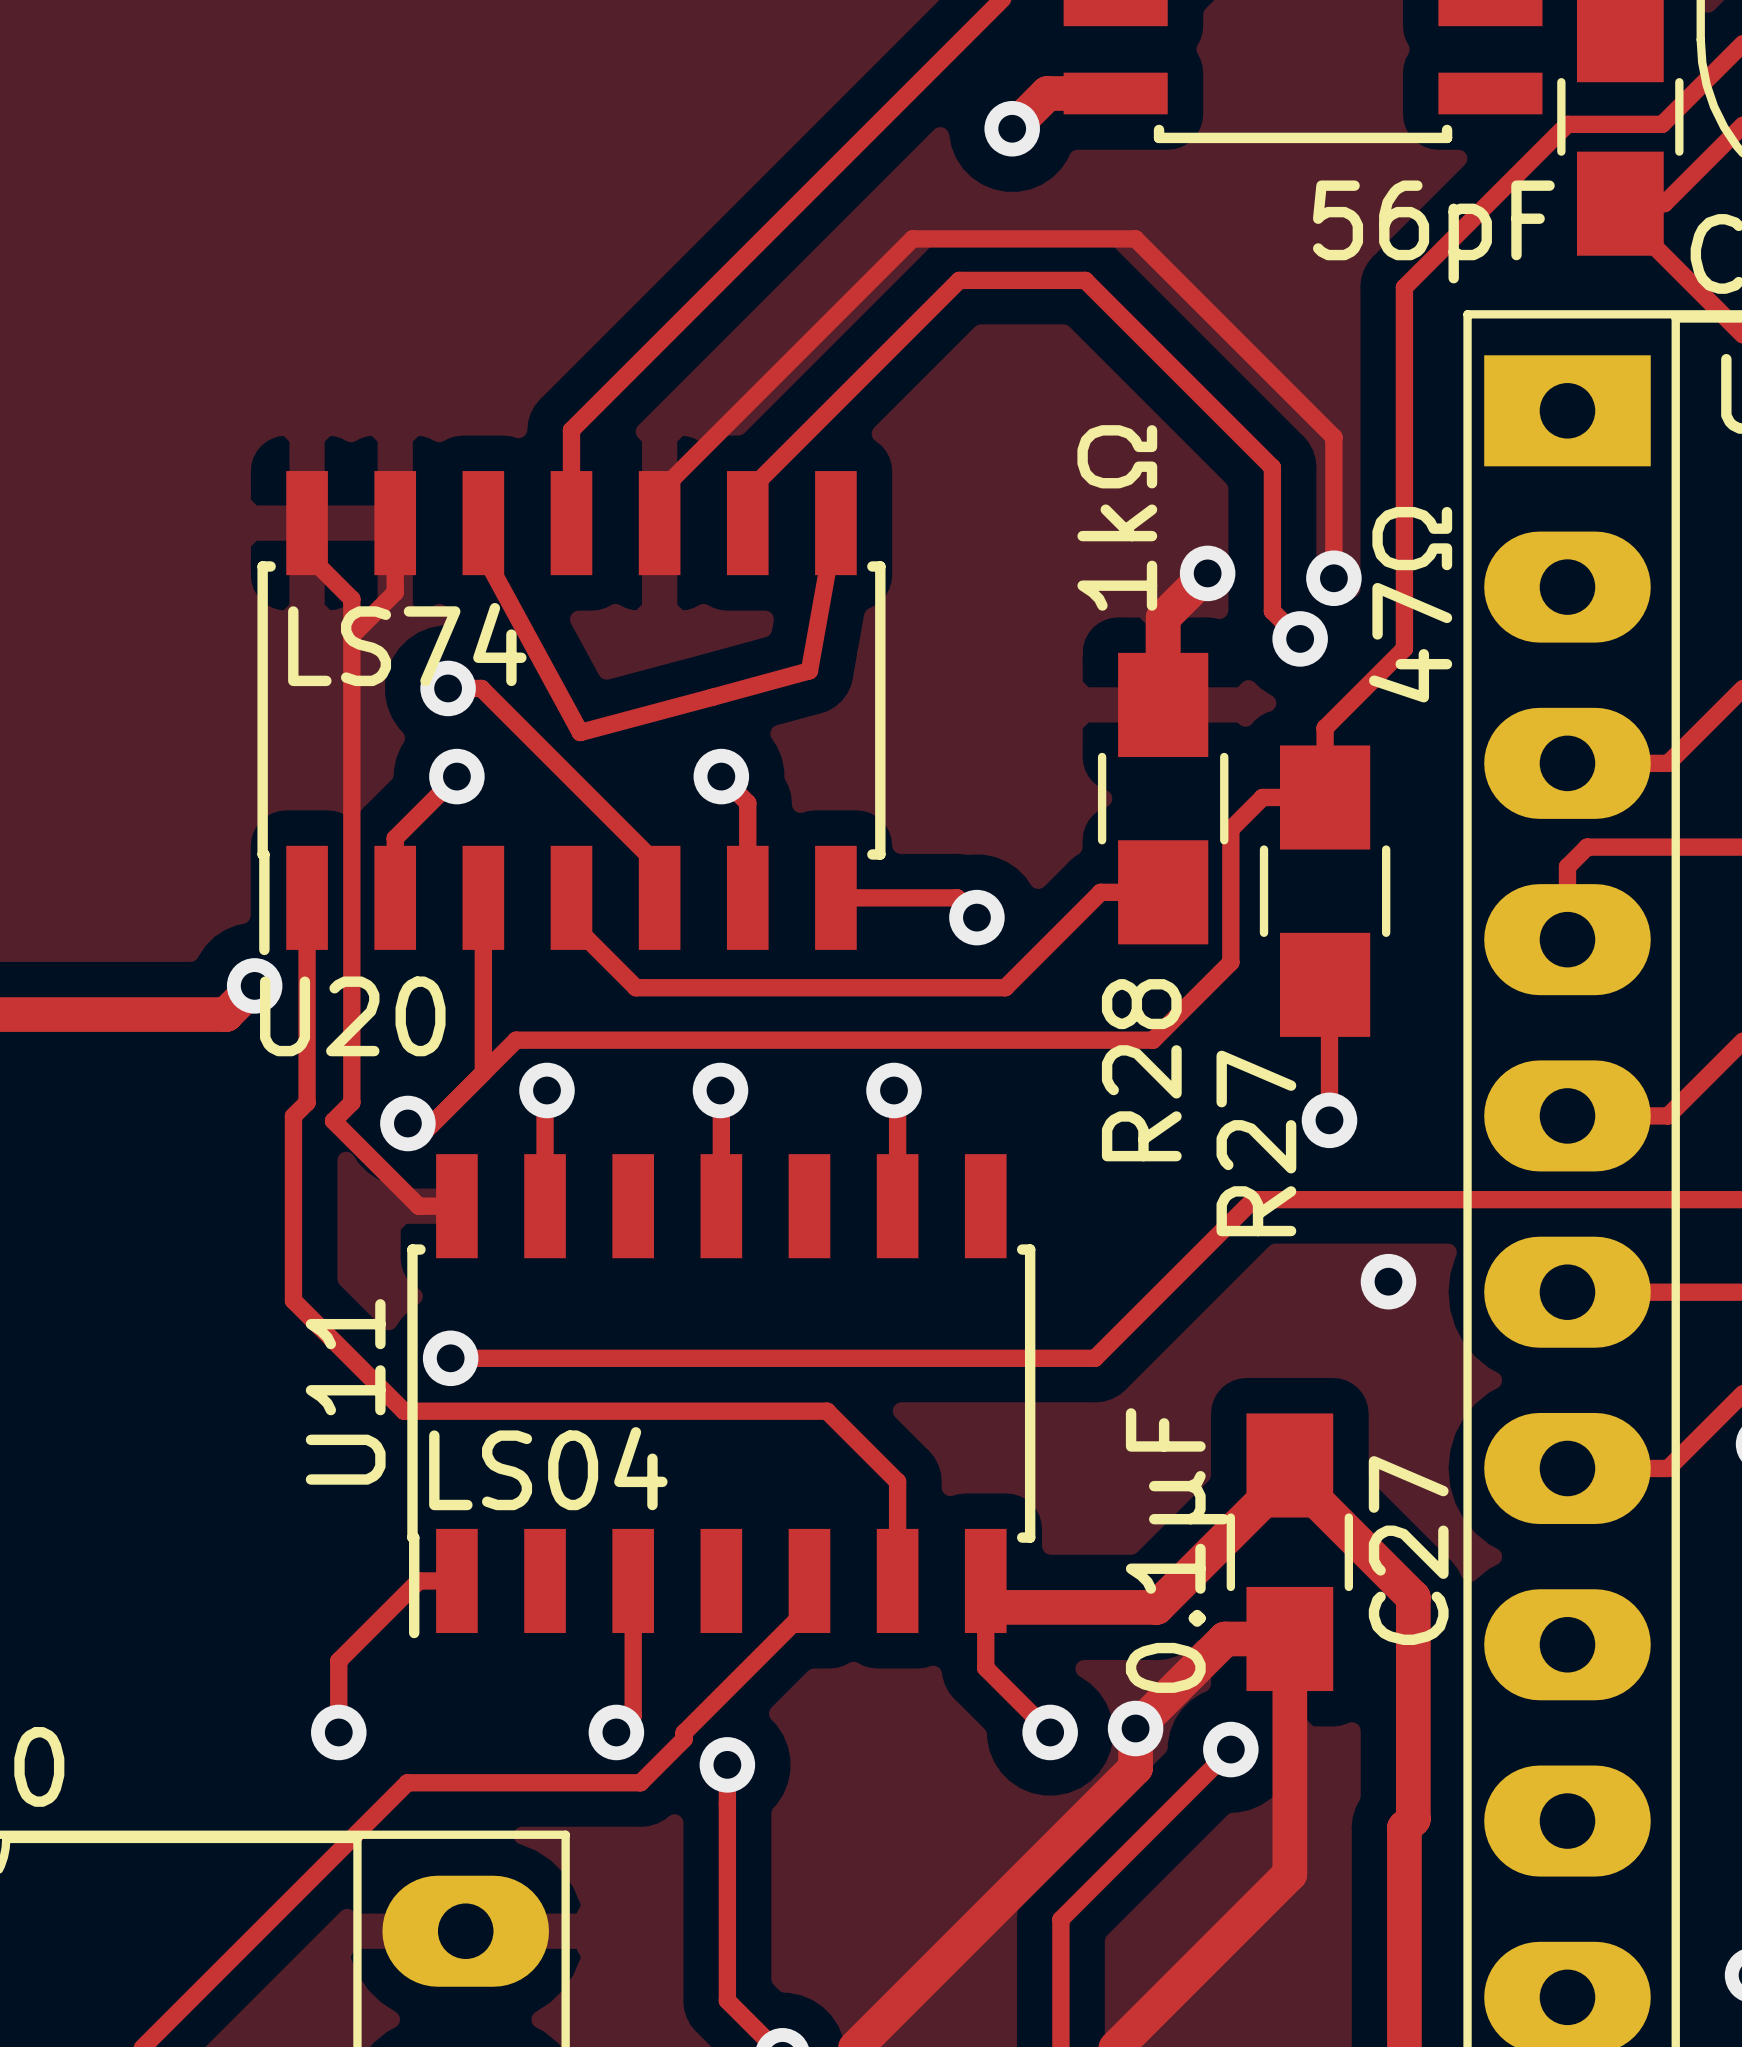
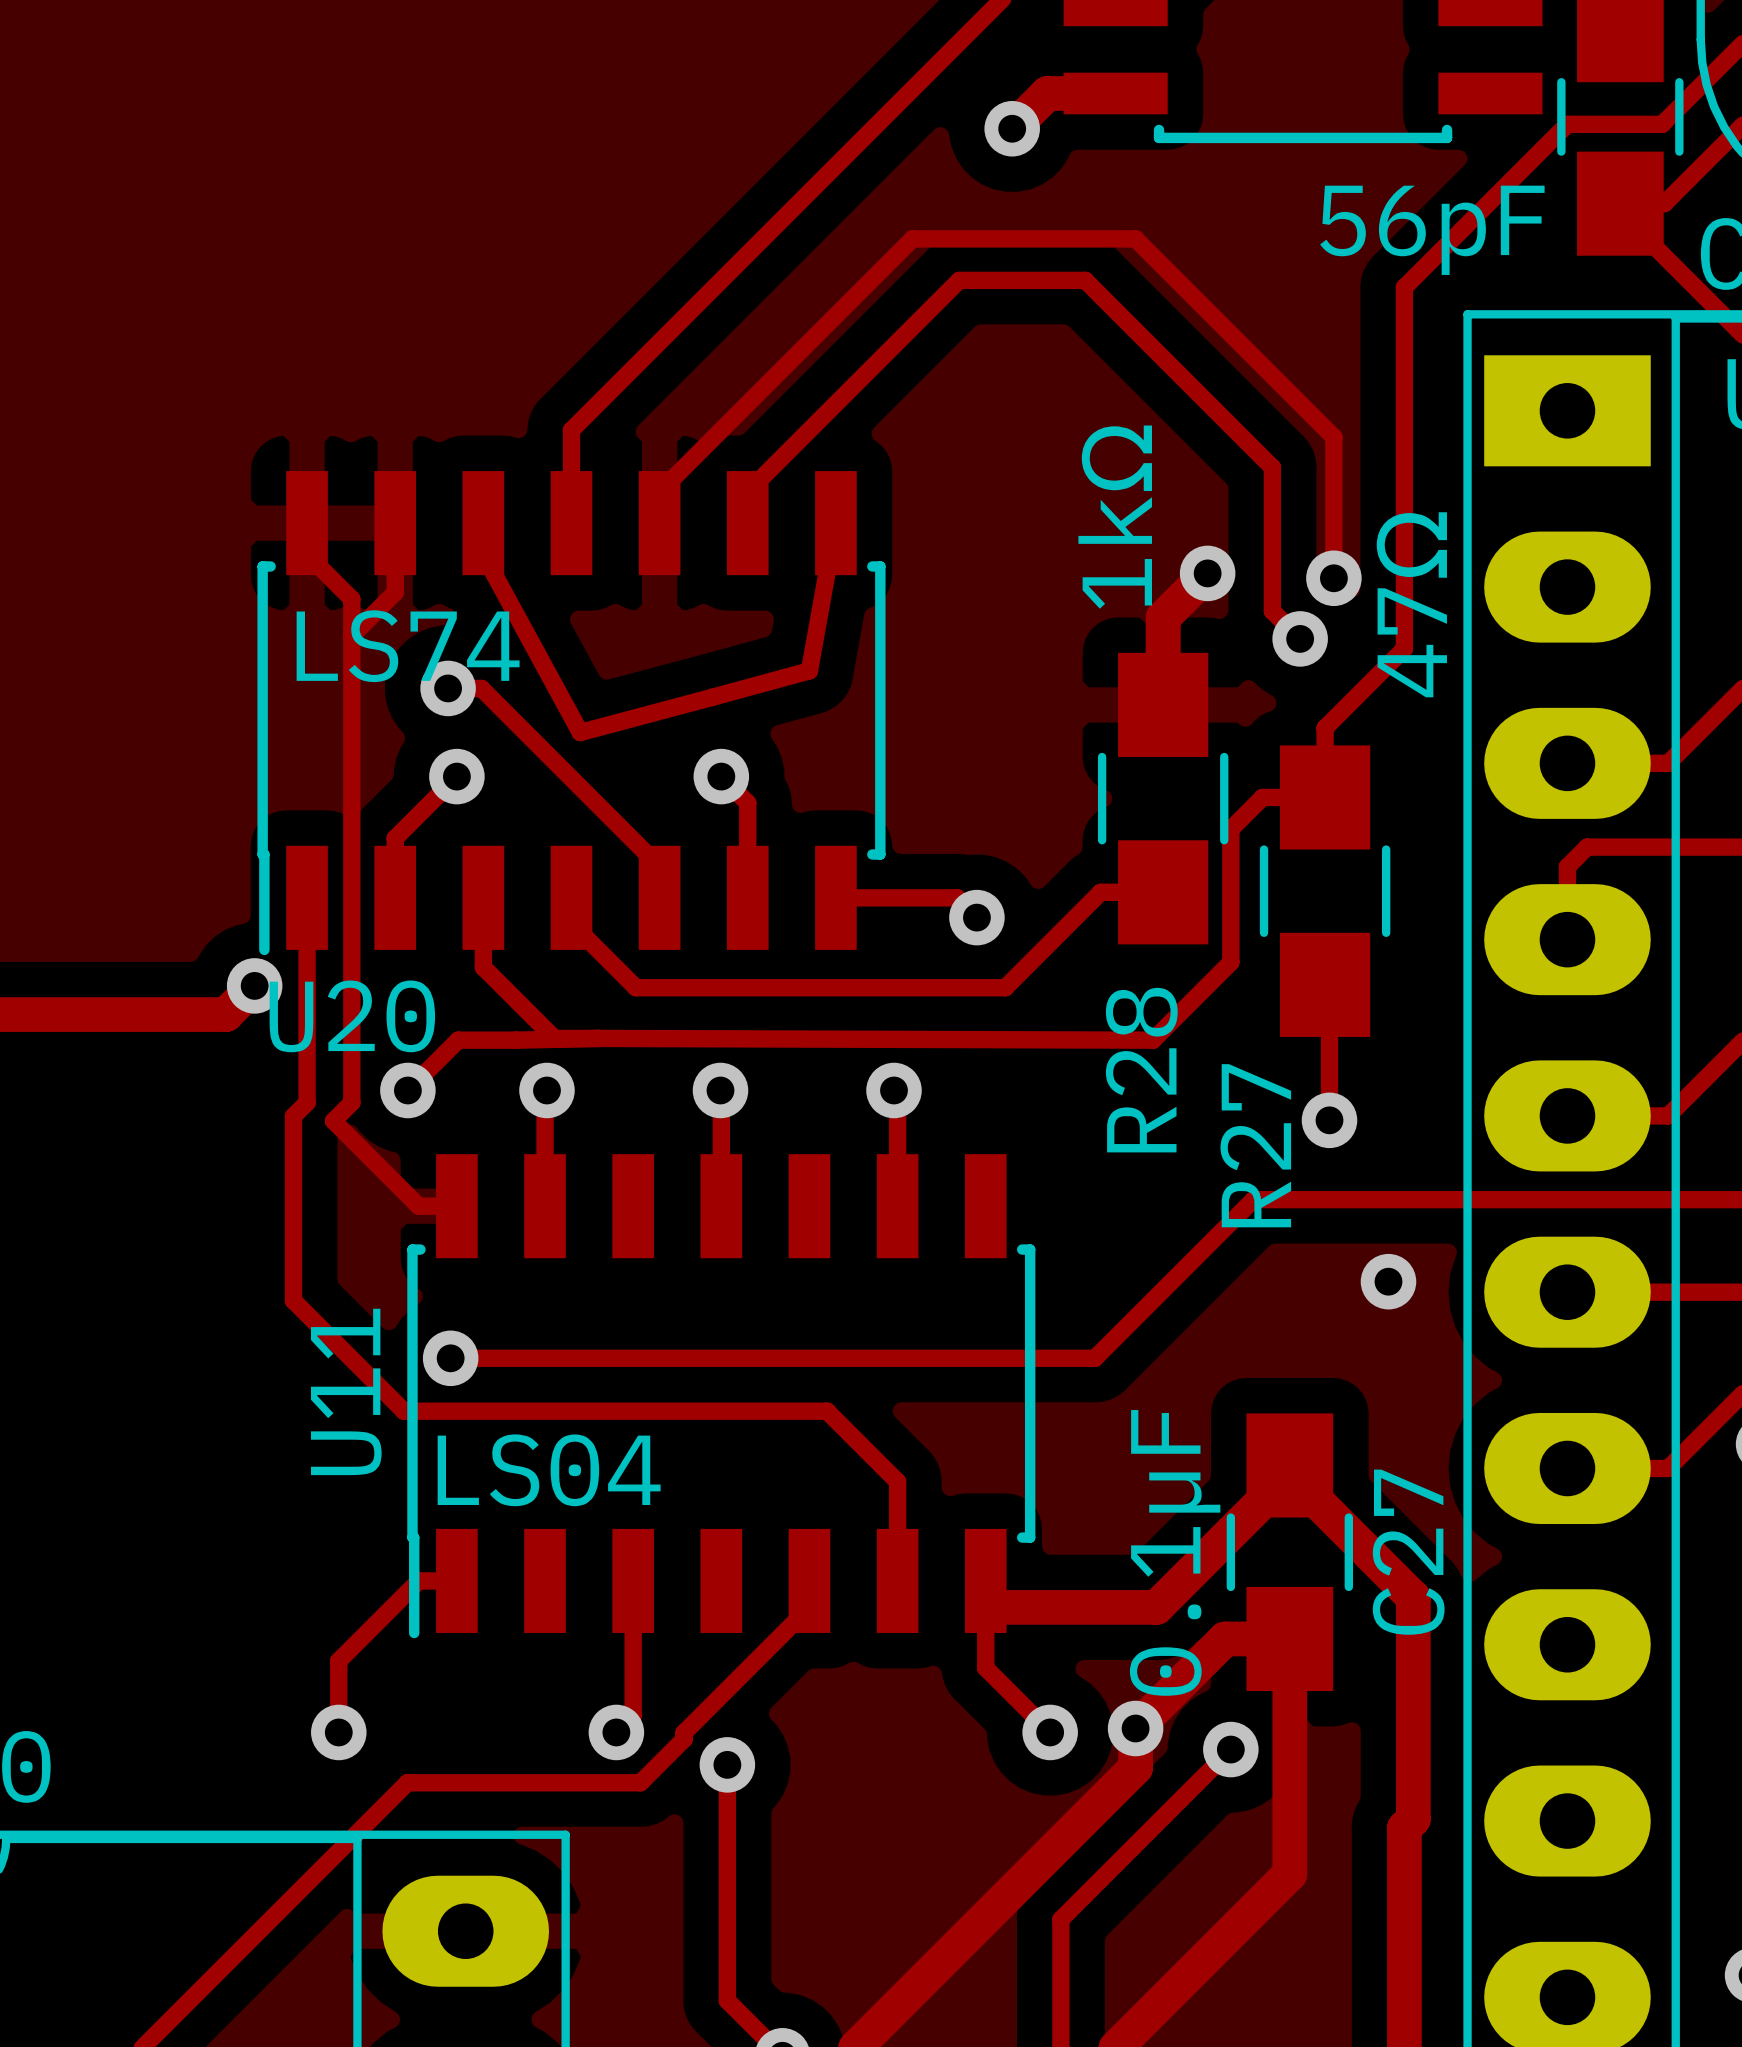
track: (483, 967) (483, 1072) -> (483, 967) (554, 1038) (599, 1038)
track: none -> (599, 1038) (458, 1040) (407, 1090)
track: (1153, 1040) (516, 1040) (422, 1134) -> (1153, 1040) (599, 1038)
via position: (407, 1123) -> (407, 1090)

